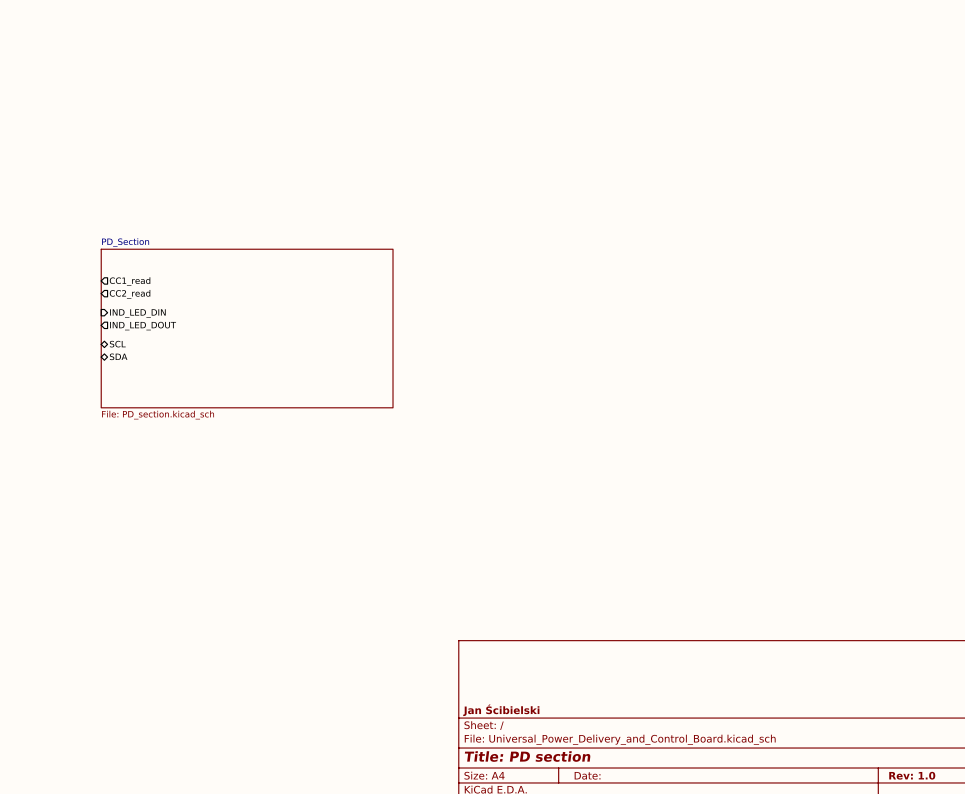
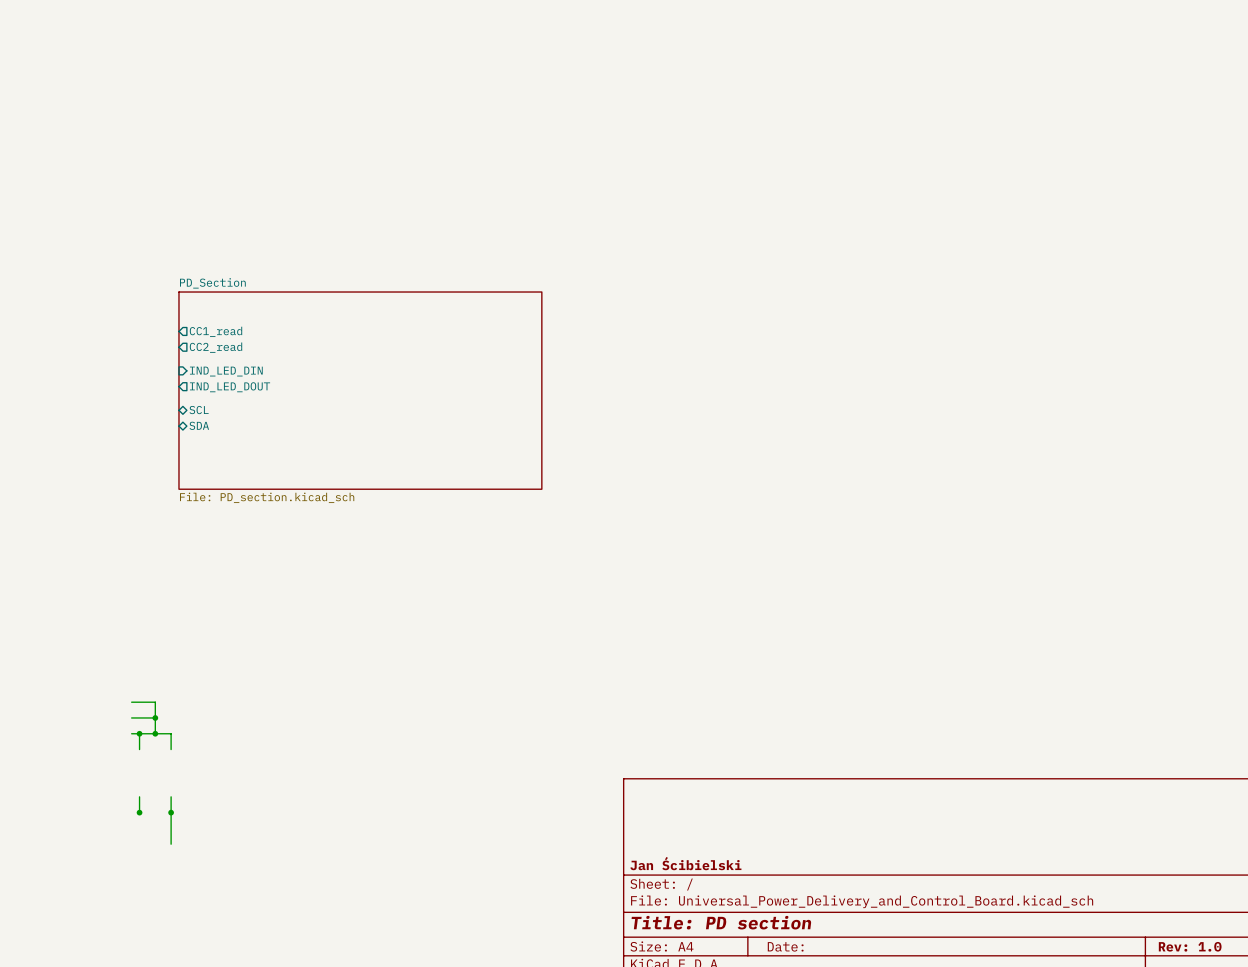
wire: none -> (131, 702) (155, 702) (155, 733)
wire: none -> (131, 717) (155, 717)
junction: none -> (155, 717)
wire: none -> (131, 733) (171, 733) (171, 749)
wire: none -> (139, 733) (139, 749)
junction: none -> (139, 733)
junction: none -> (155, 733)
wire: none -> (139, 796) (139, 812)
wire: none -> (171, 796) (171, 844)
junction: none -> (139, 812)
junction: none -> (171, 812)

